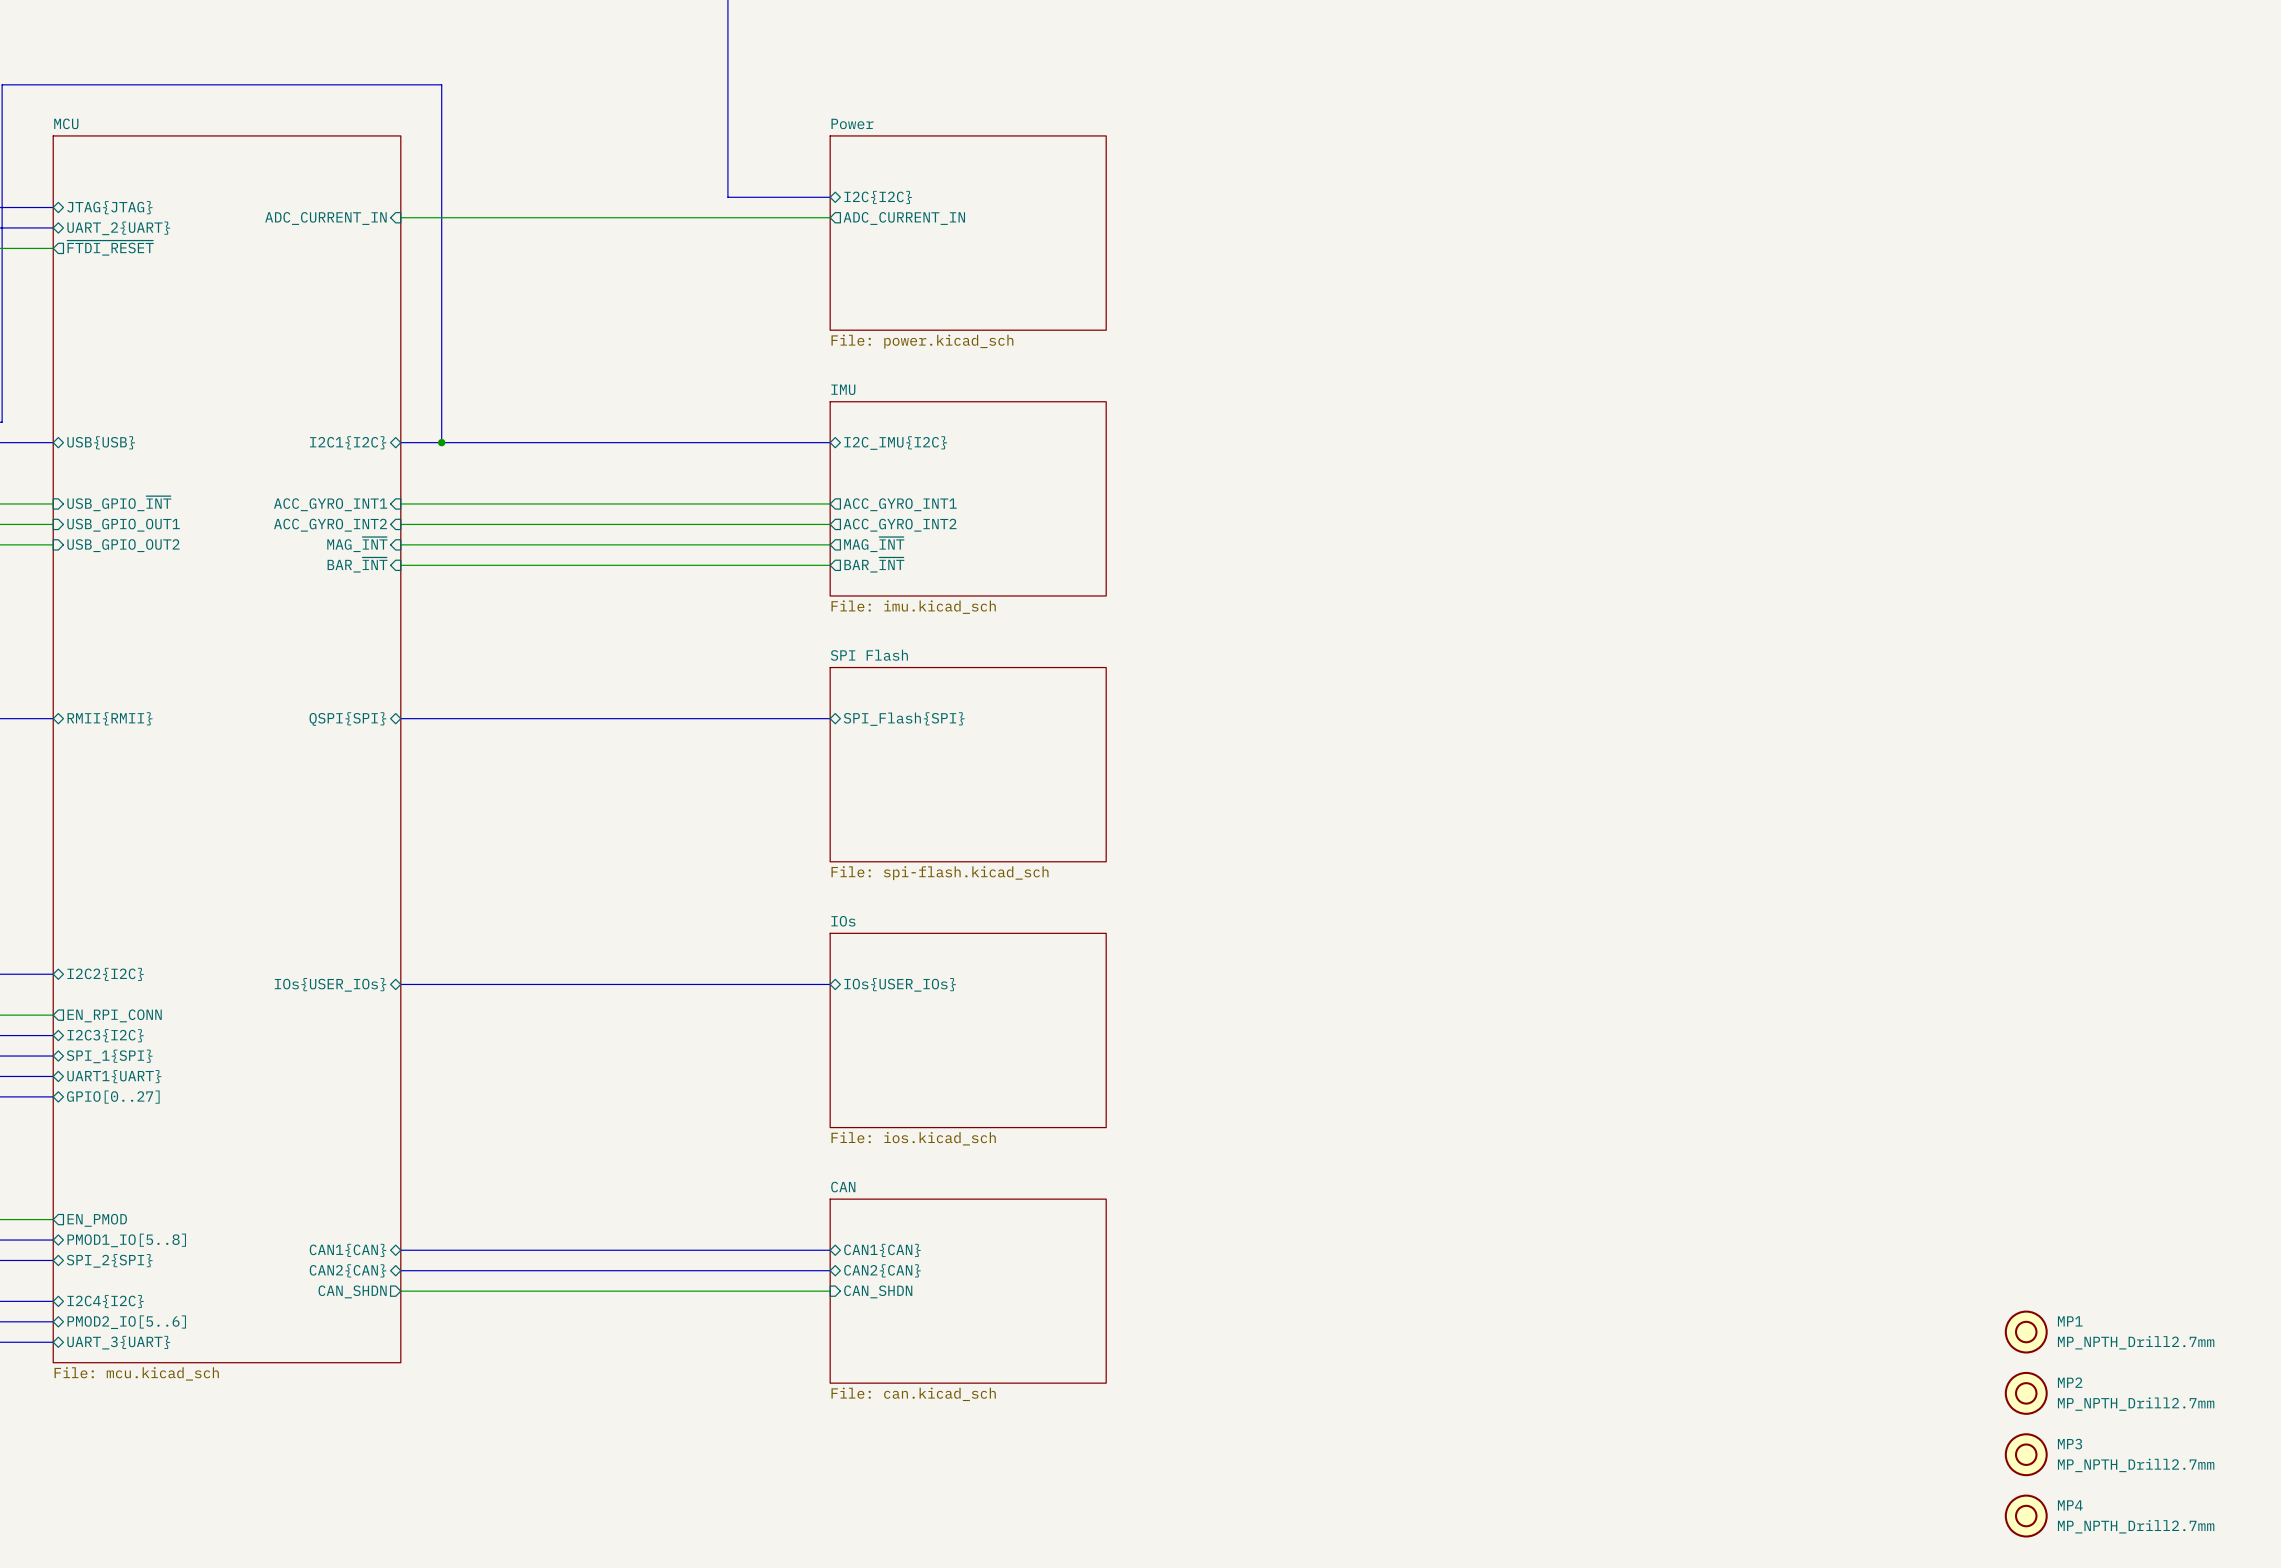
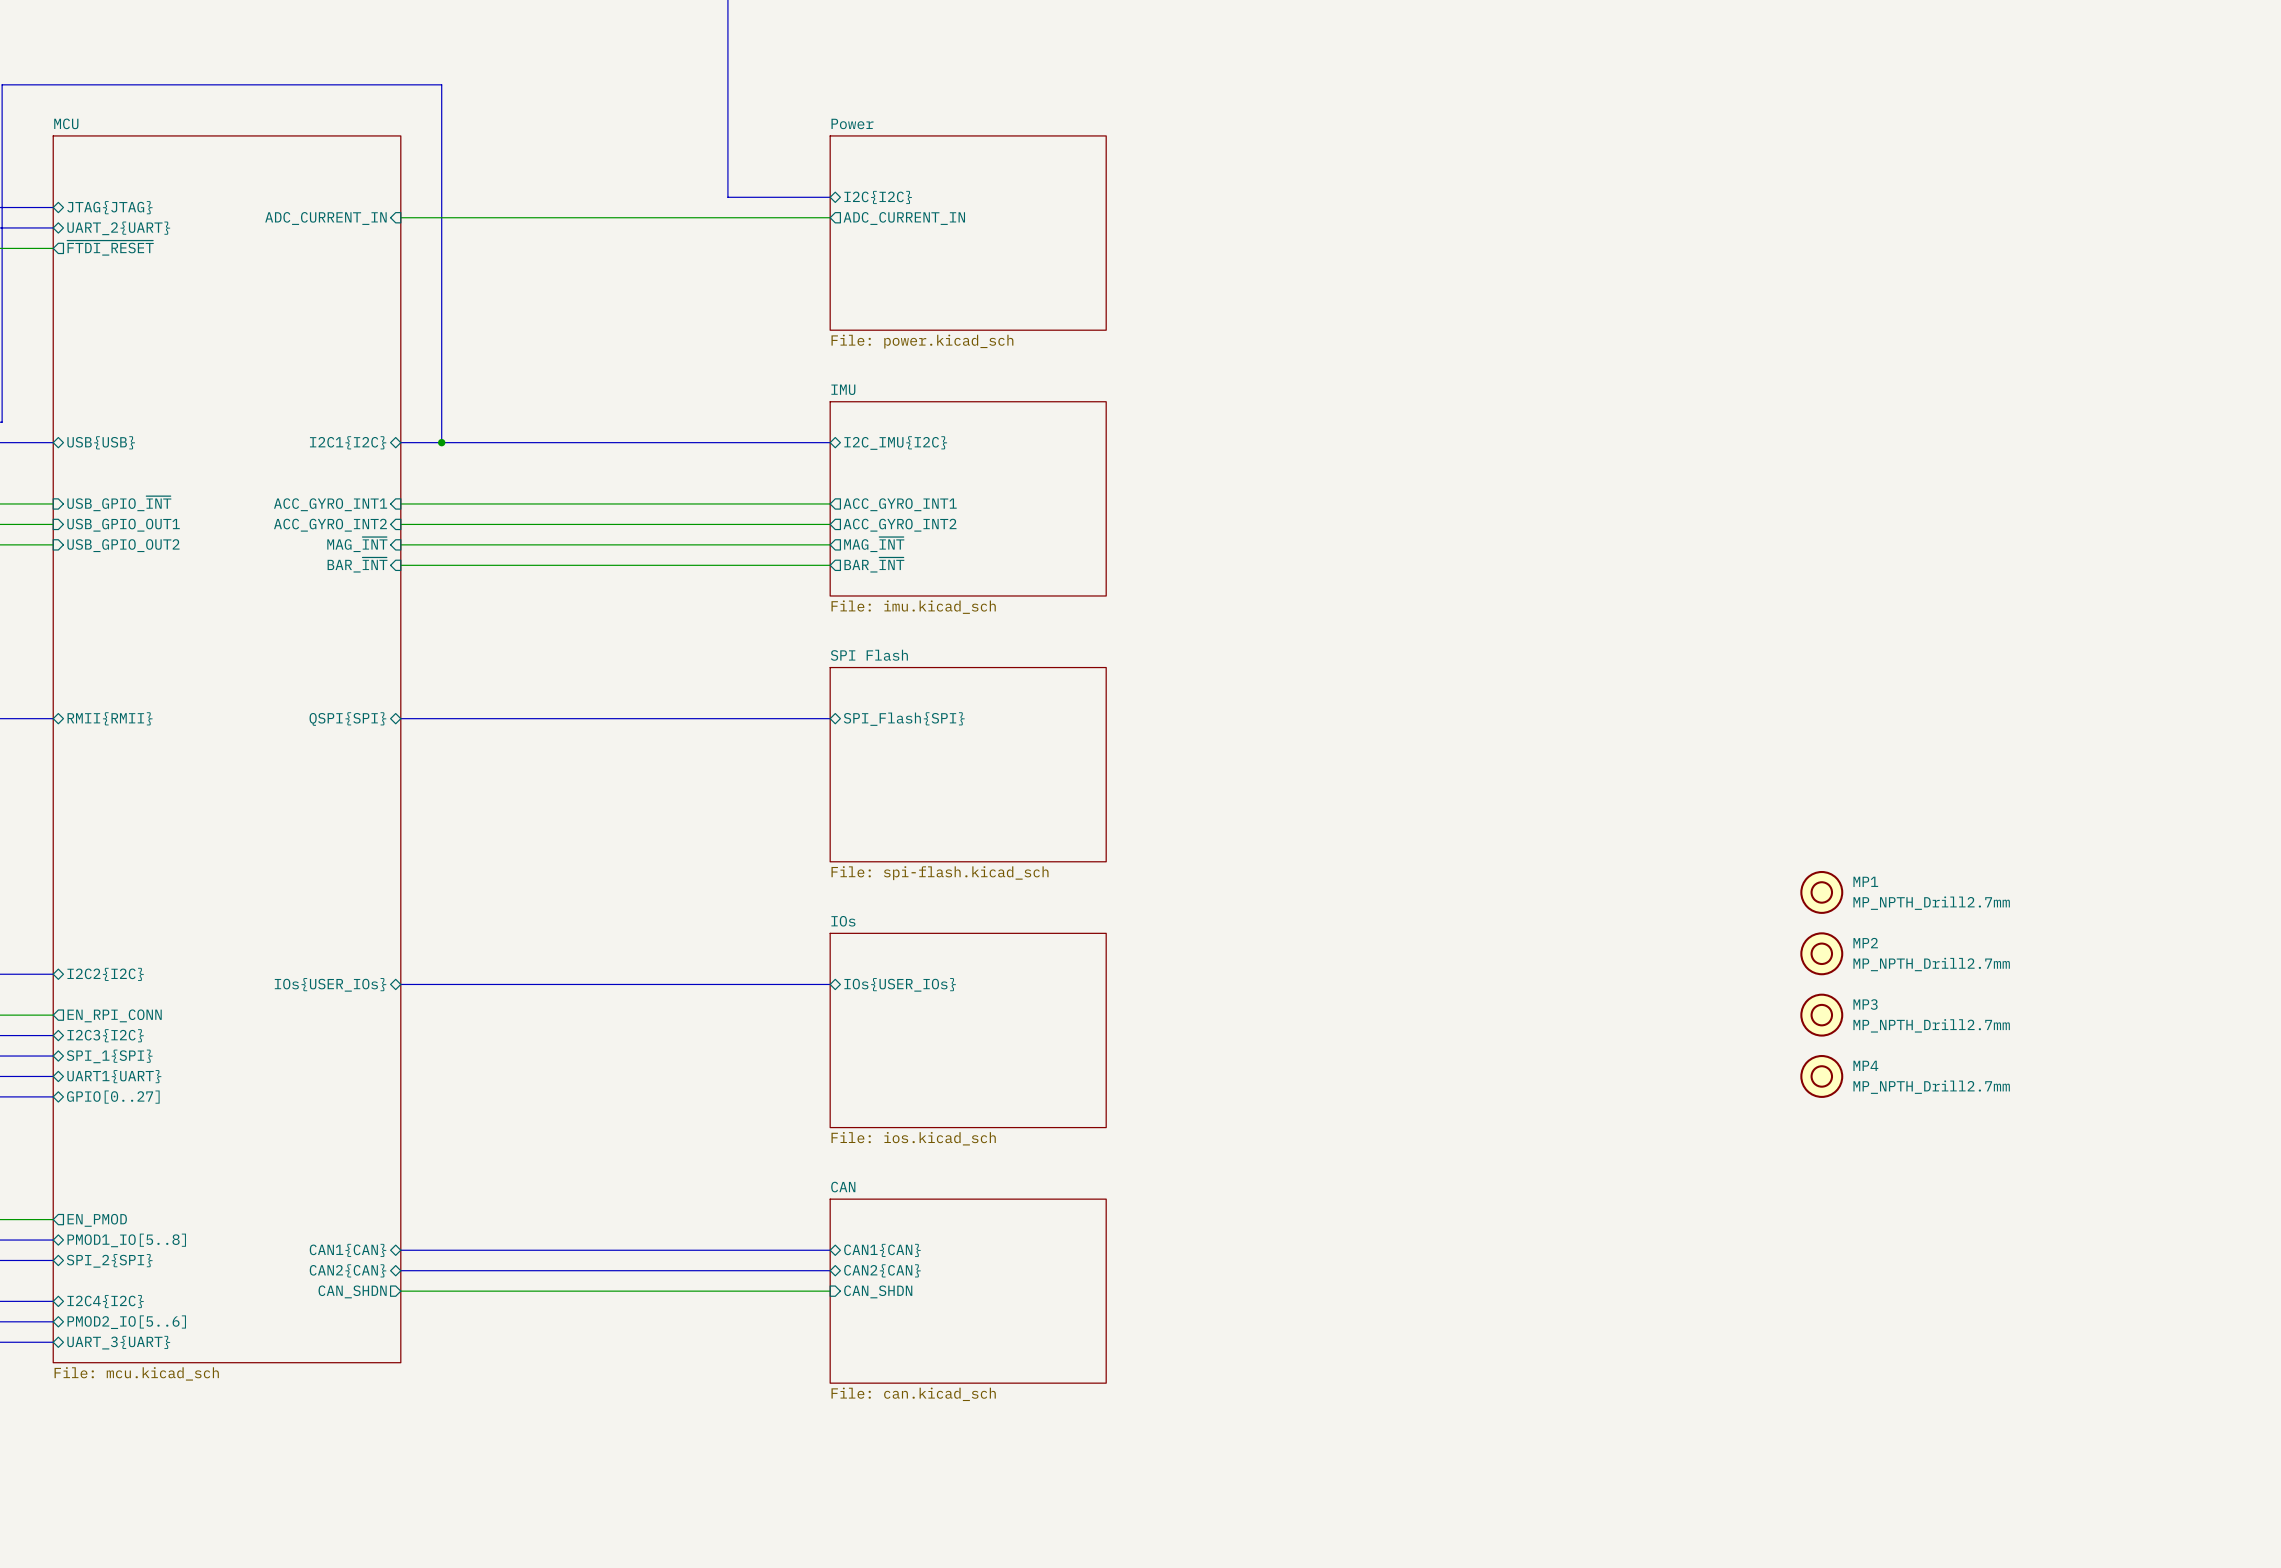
MP1 position: (2026, 1332) -> (1821, 892)
MP2 position: (2026, 1393) -> (1821, 953)
MP3 position: (2026, 1454) -> (1821, 1015)
MP4 position: (2026, 1516) -> (1821, 1076)

